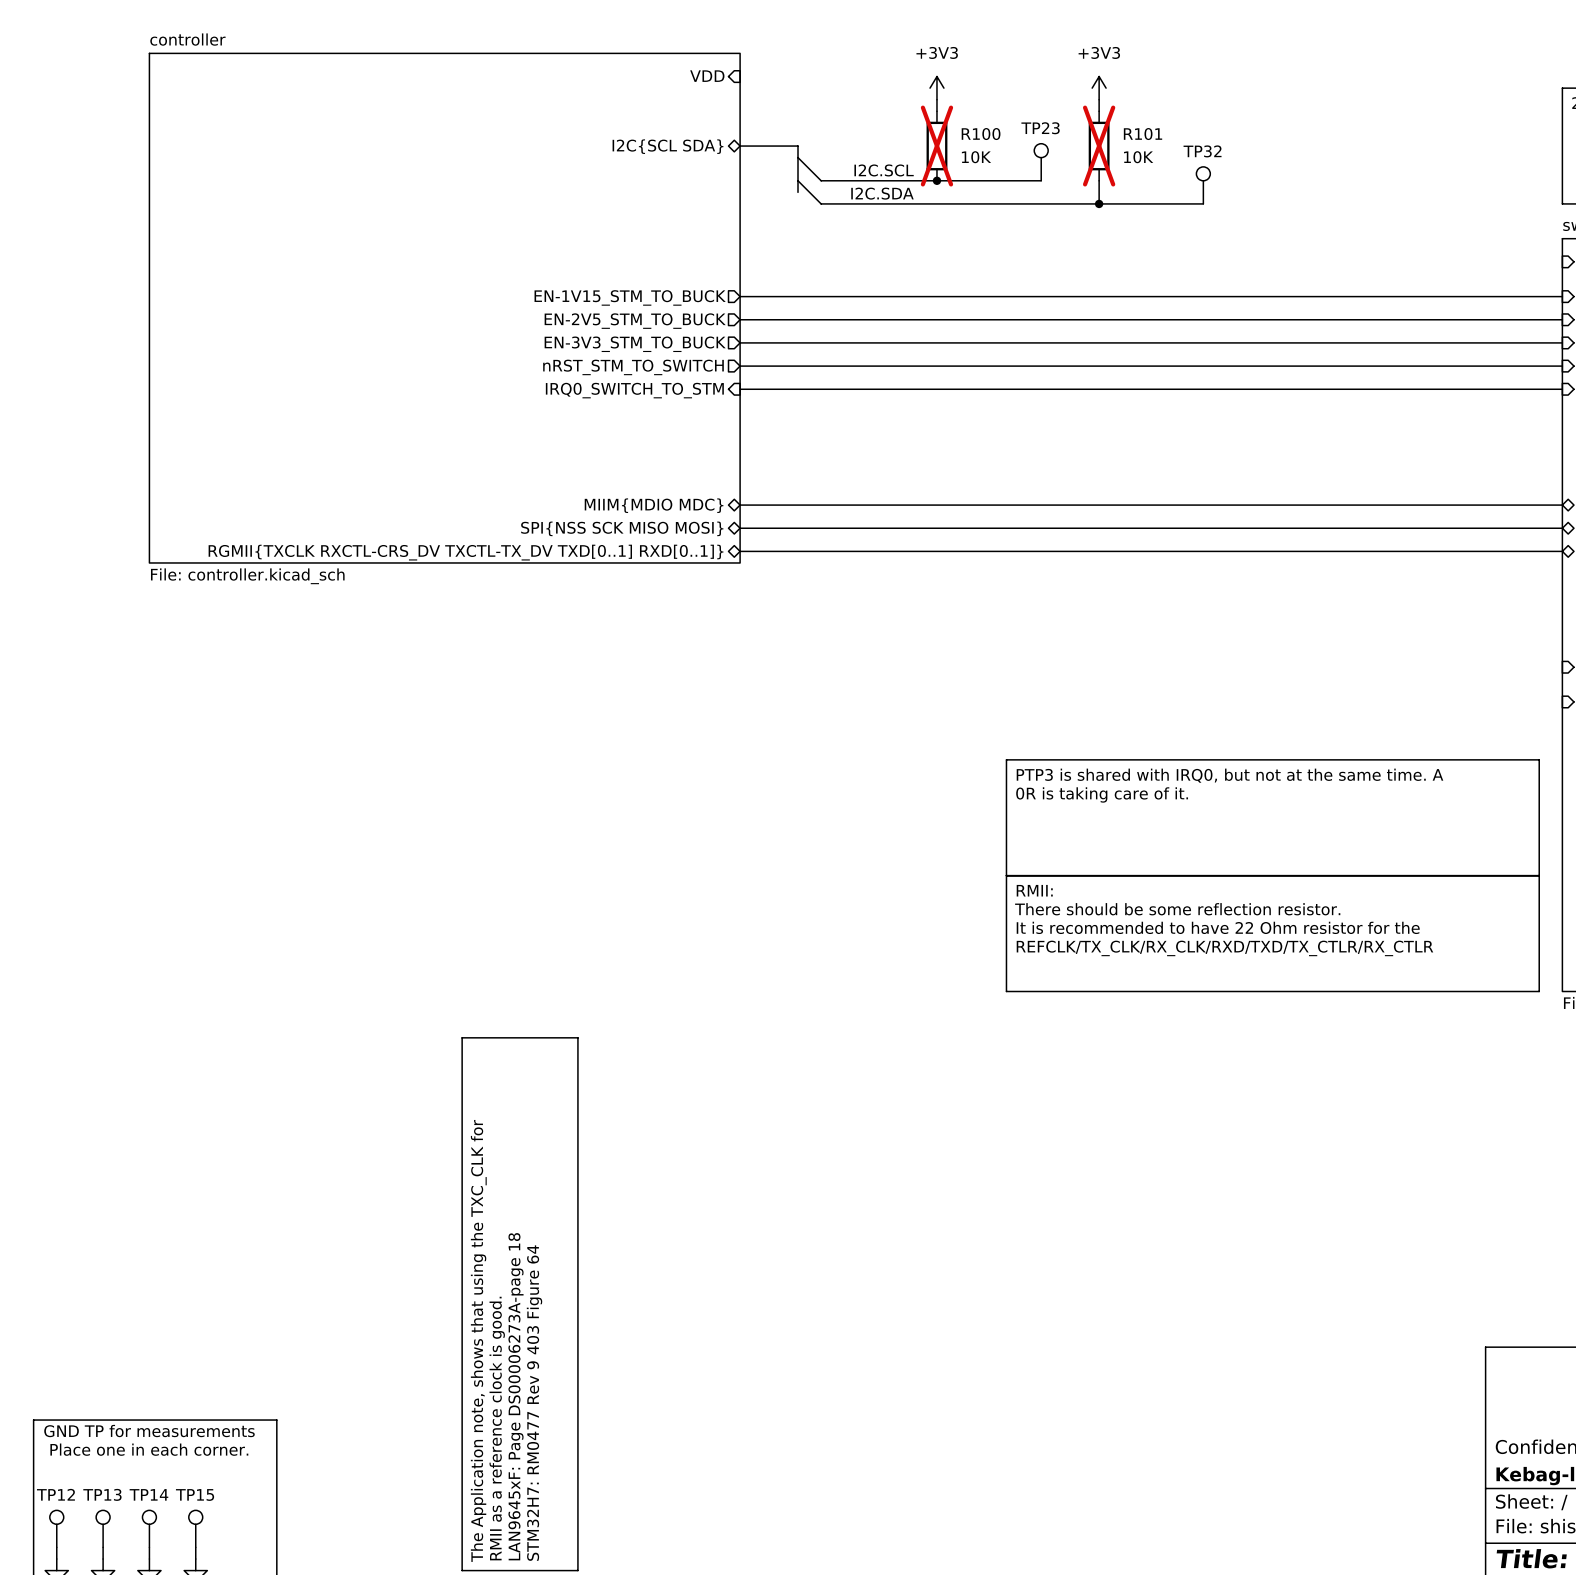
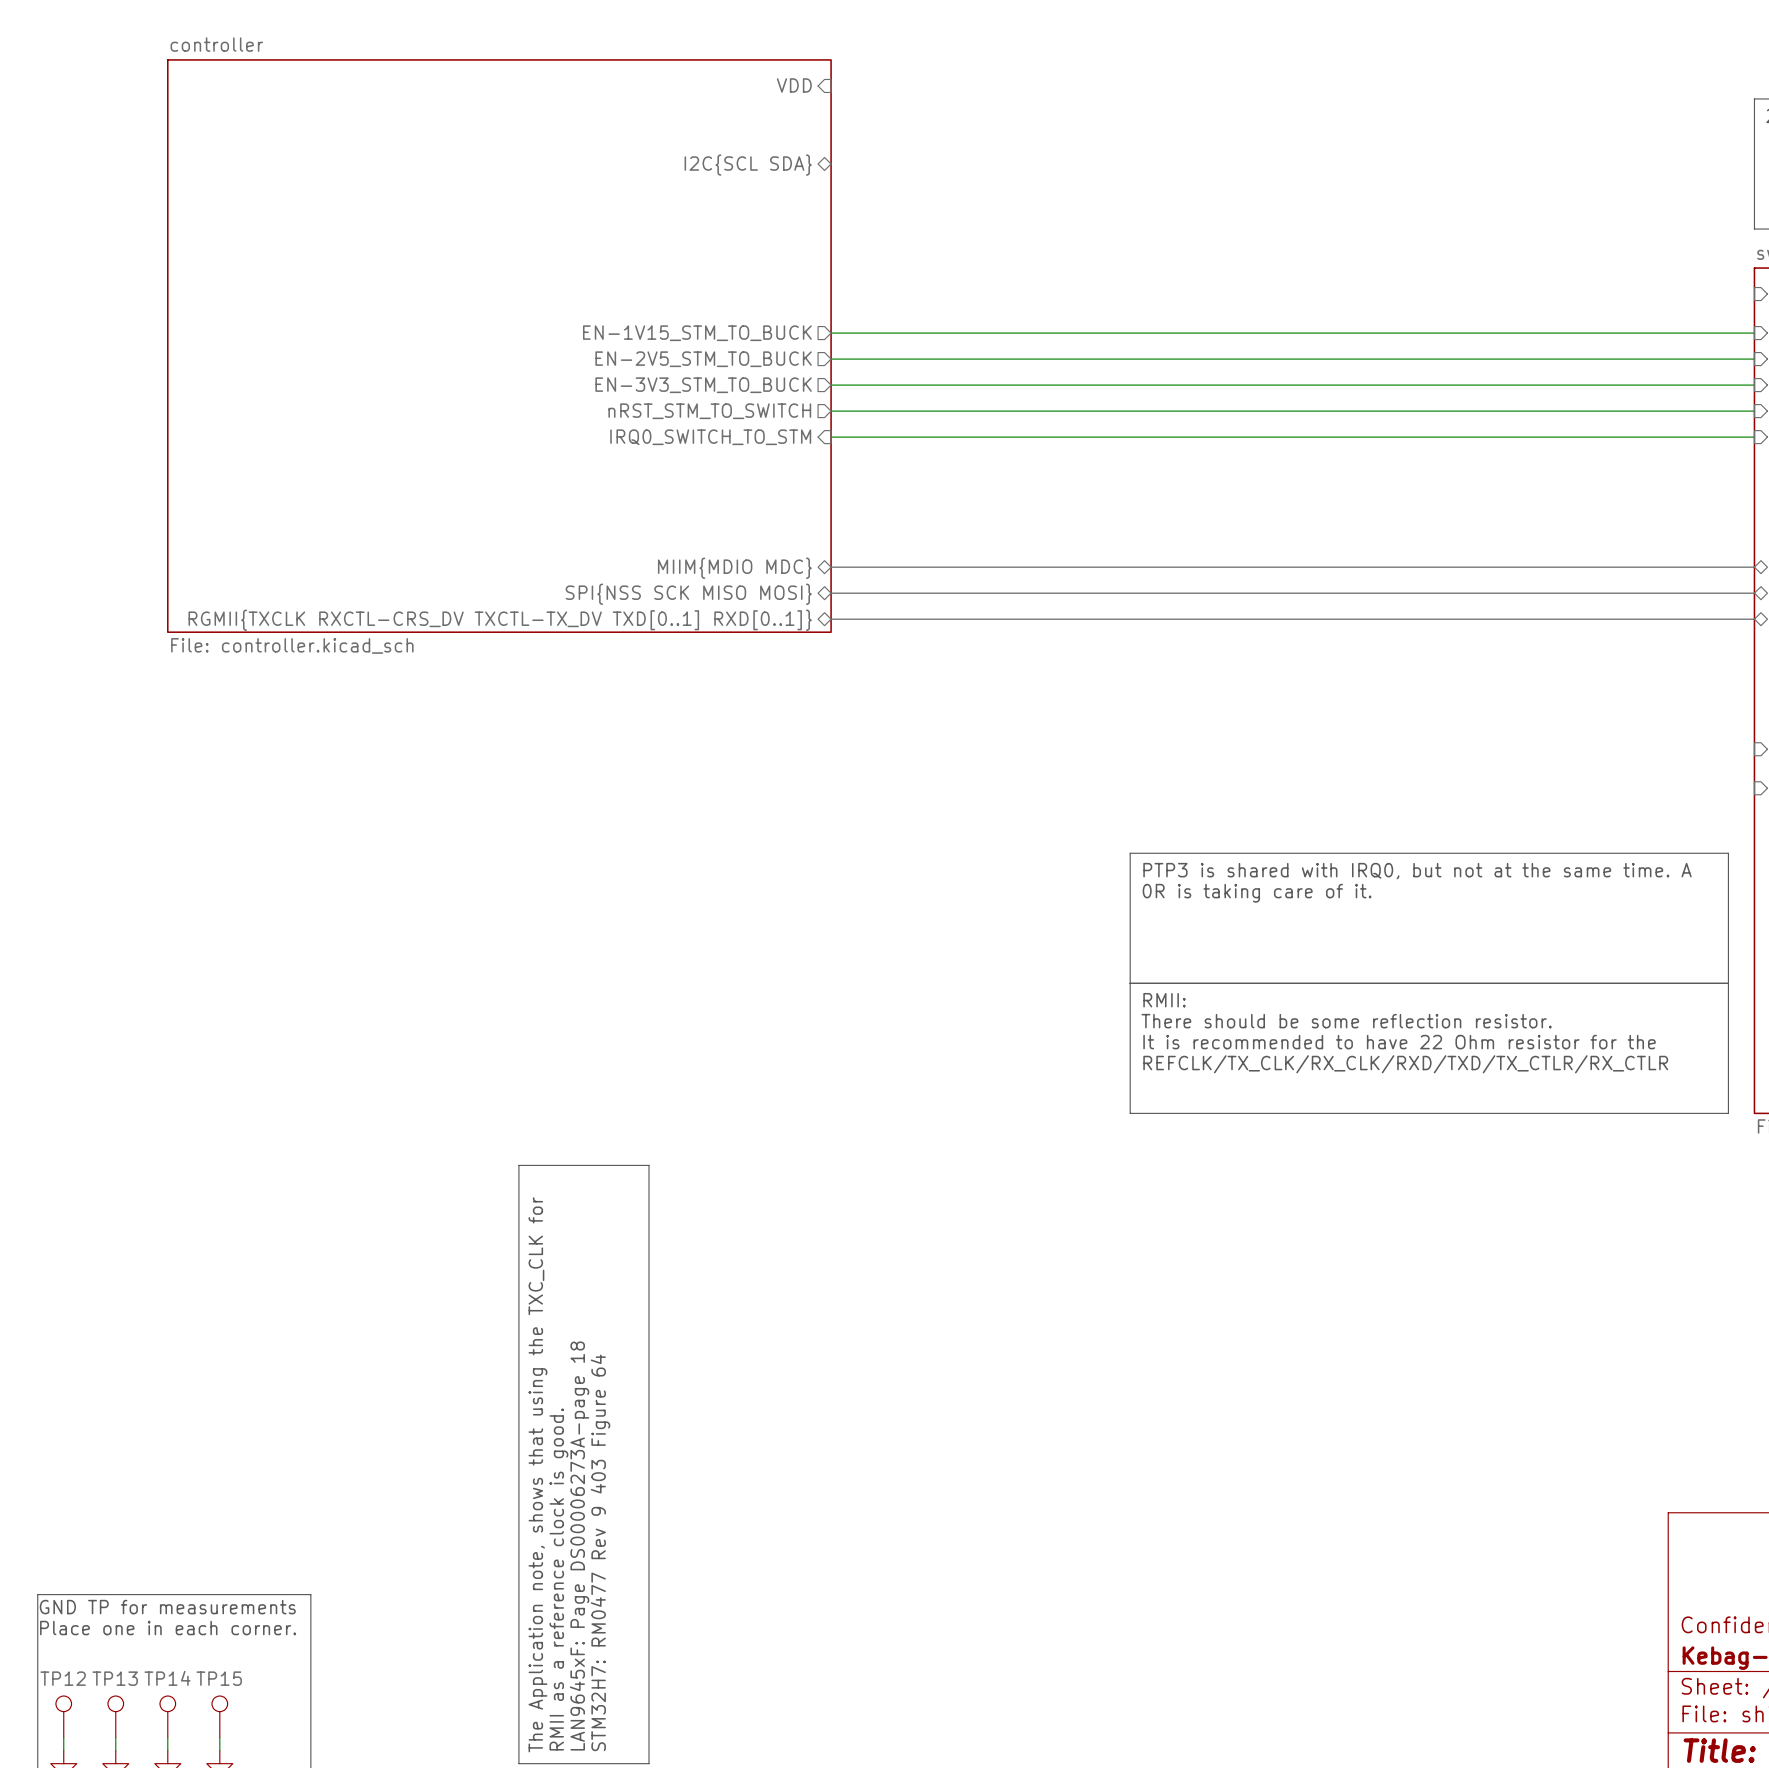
power symbol: +3V3 (936, 88) -> none
power symbol: +3V3 (1099, 88) -> none
wire: (936, 99) (936, 111) -> none
wire: (1099, 99) (1099, 111) -> none
bus: (740, 146) (798, 146) (798, 192) -> none
R100: 10K (936, 146) -> none
R101: 10K (1099, 146) -> none
wire: (798, 157) (821, 180) (1041, 180) -> none
TP23: (1041, 162) -> none
label: I2C.SCL (884, 170) -> none
wire: (798, 180) (821, 203) (1203, 203) -> none
junction: (936, 180) -> none
wire: (1099, 180) (1099, 203) -> none
TP32: (1203, 185) -> none
label: I2C.SDA (882, 193) -> none
junction: (1099, 203) -> none

